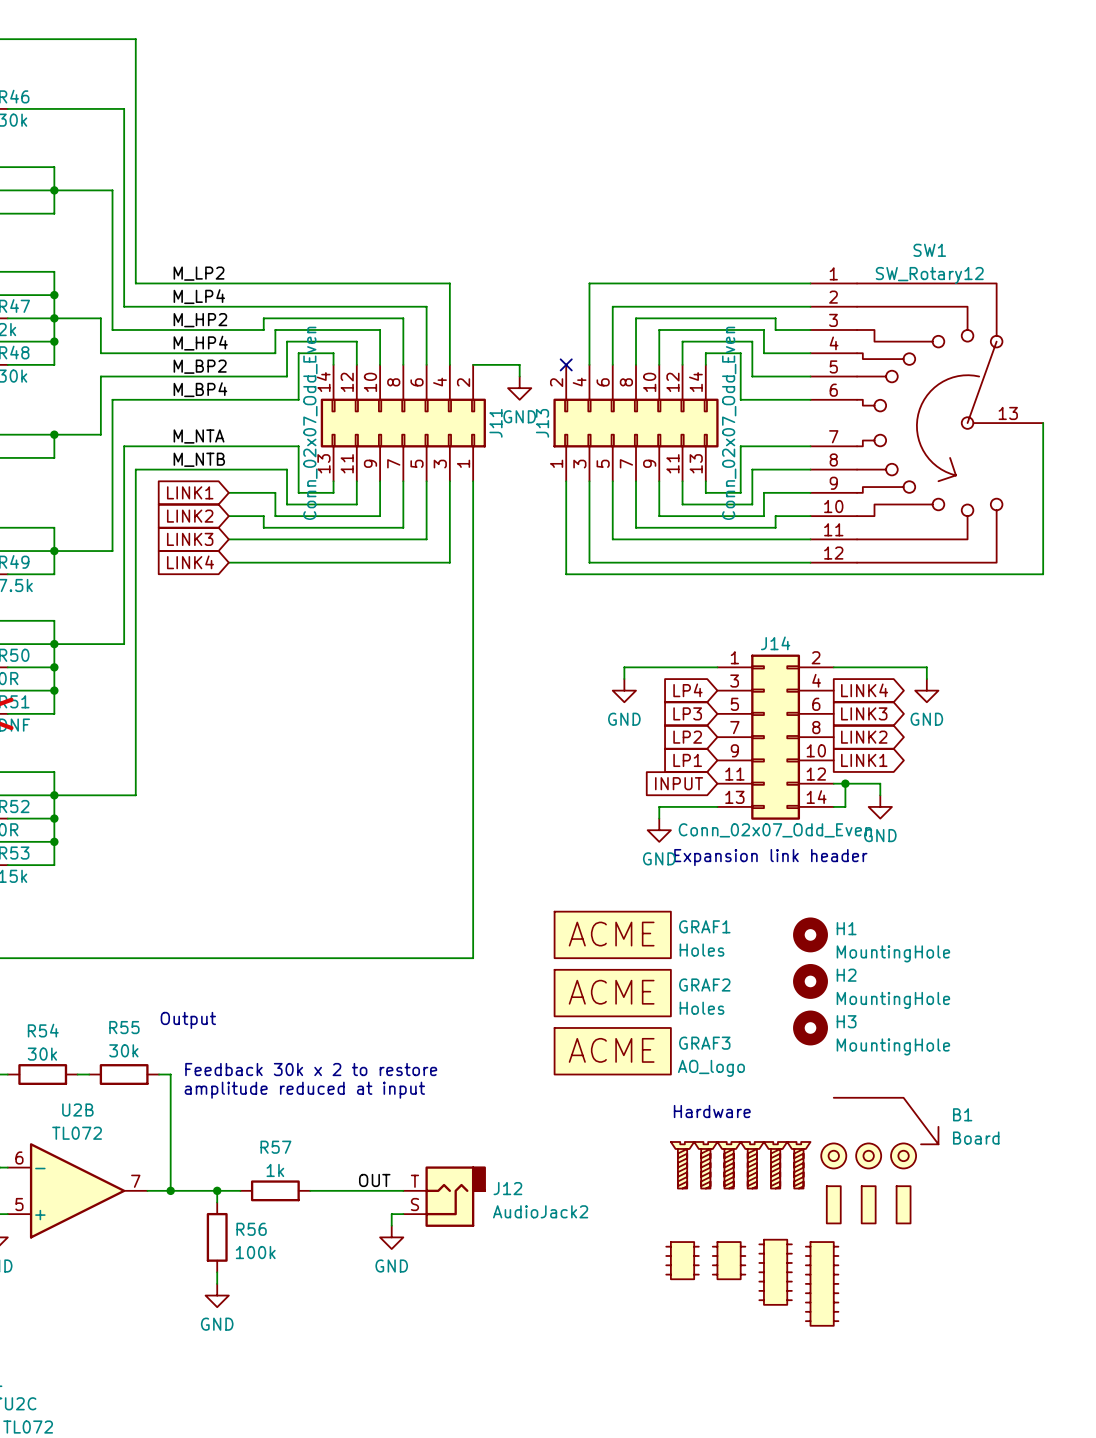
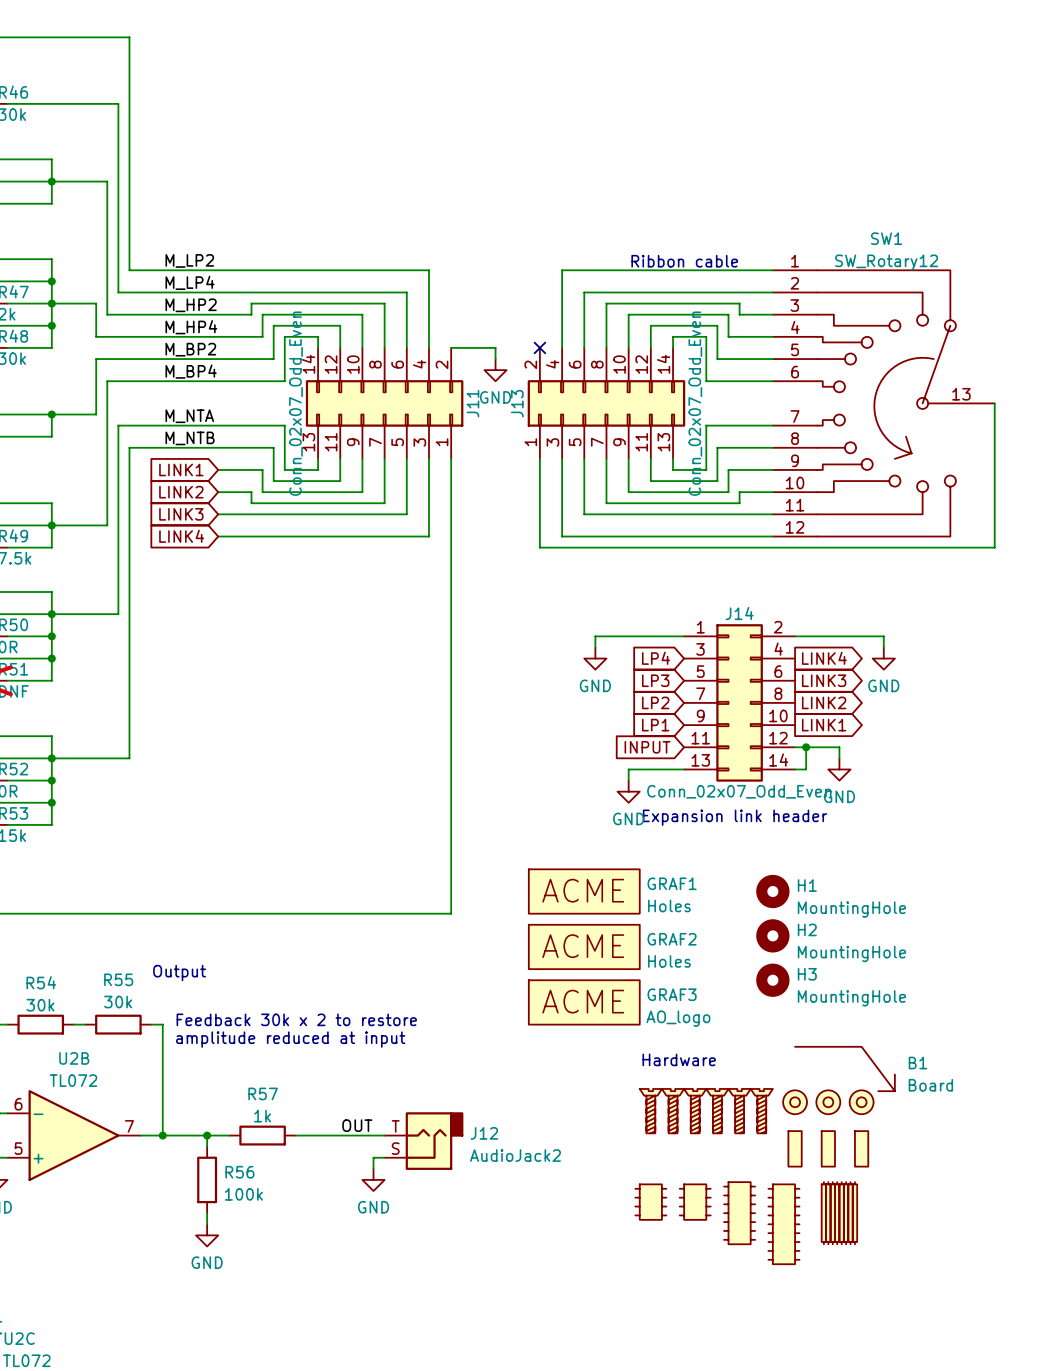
text: none -> Ribbon cable (684, 261)
part: none -> (839, 1213)

